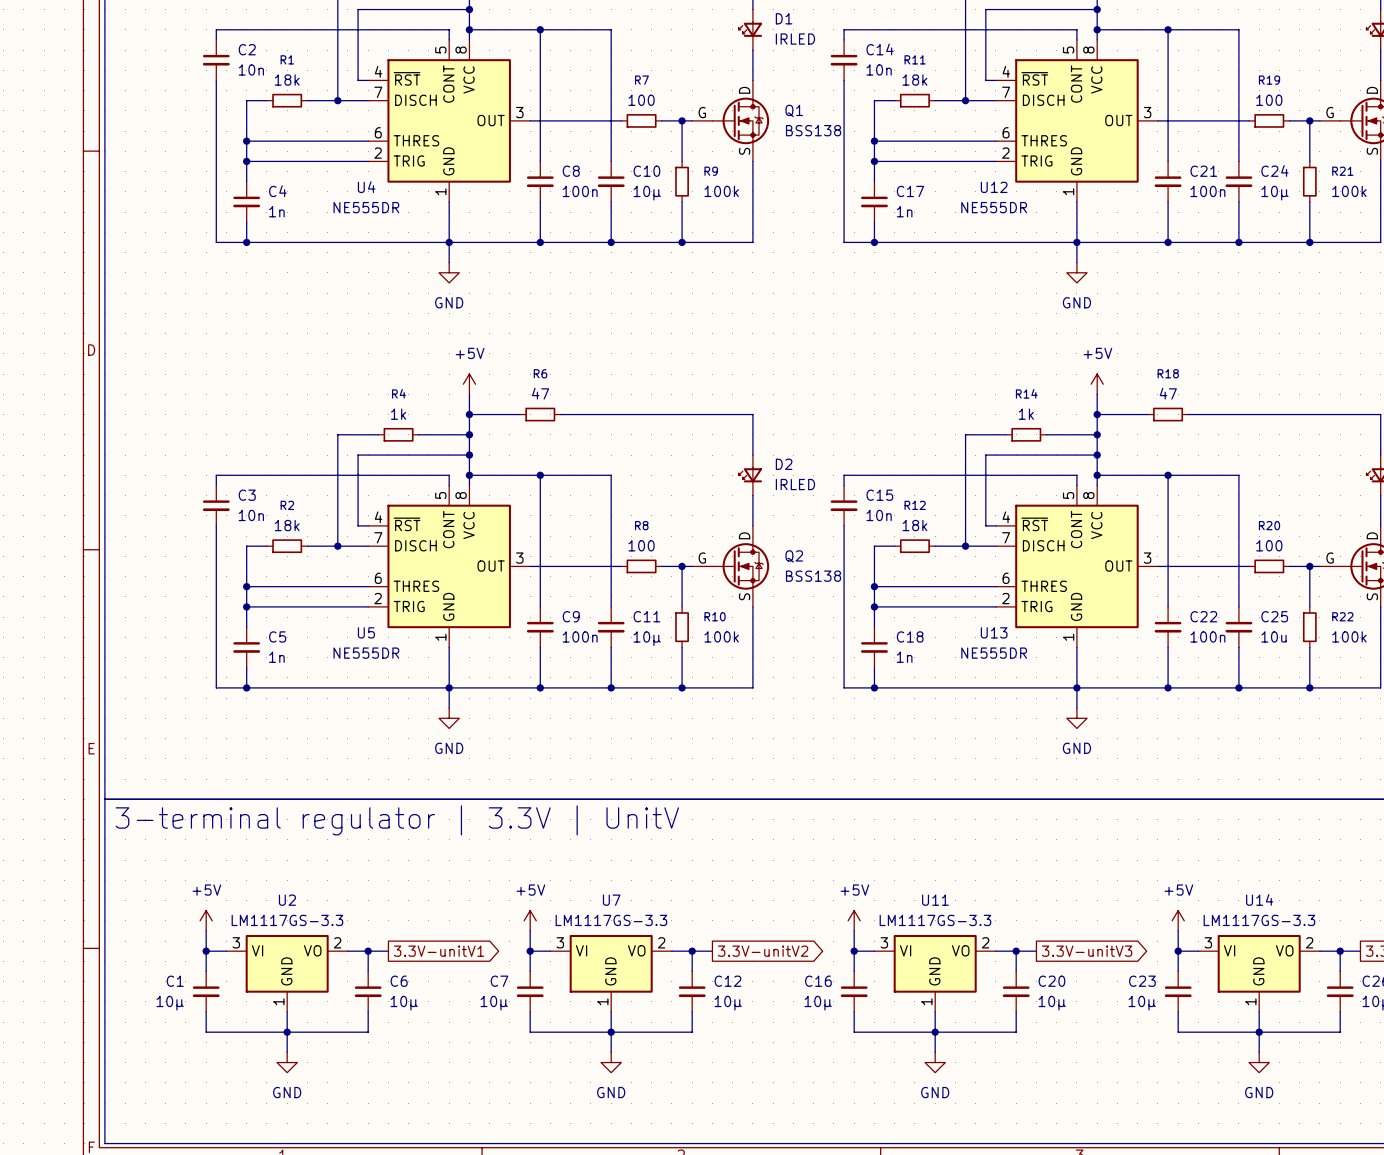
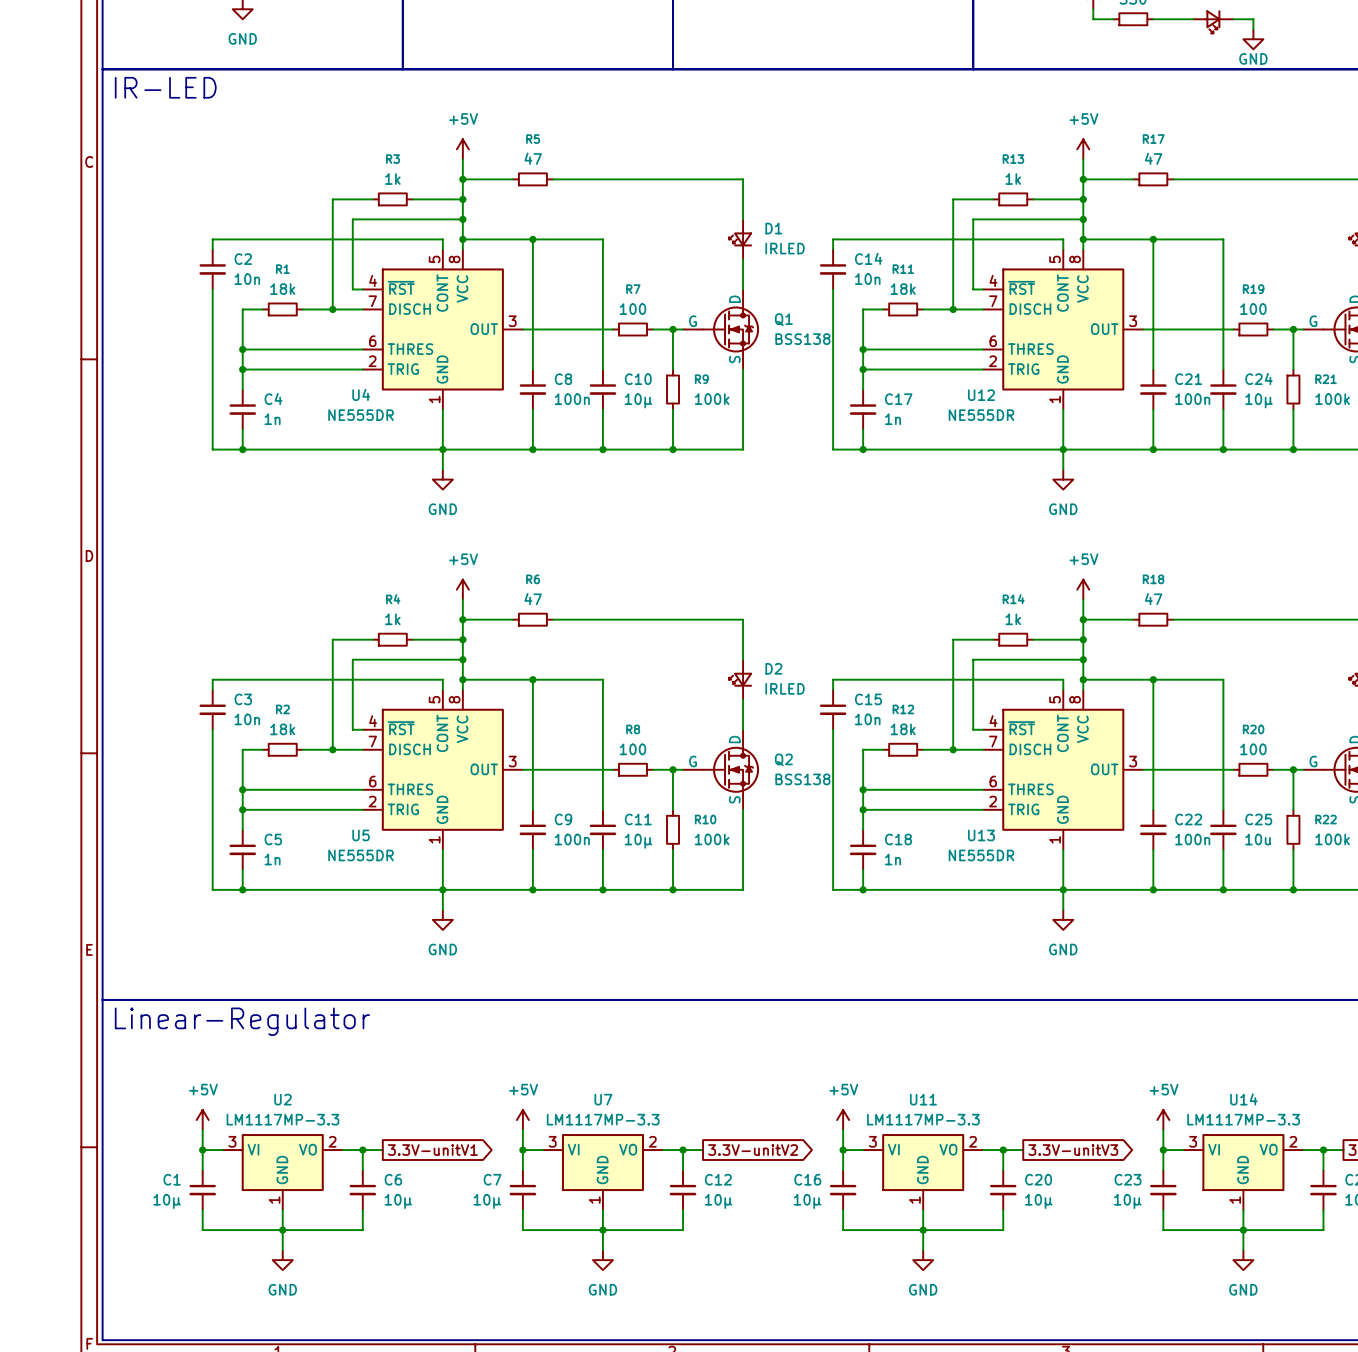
text: 3-terminal regulator | 3.3V | UnitV (397, 820) -> Linear-Regulator (242, 1021)
U2 value: LM1117GS-3.3 (287, 920) -> LM1117MP-3.3 (282, 1119)
U7 value: LM1117GS-3.3 (611, 920) -> LM1117MP-3.3 (603, 1119)
U11 value: LM1117GS-3.3 (935, 920) -> LM1117MP-3.3 (923, 1119)
U14 value: LM1117GS-3.3 (1259, 920) -> LM1117MP-3.3 (1243, 1119)

